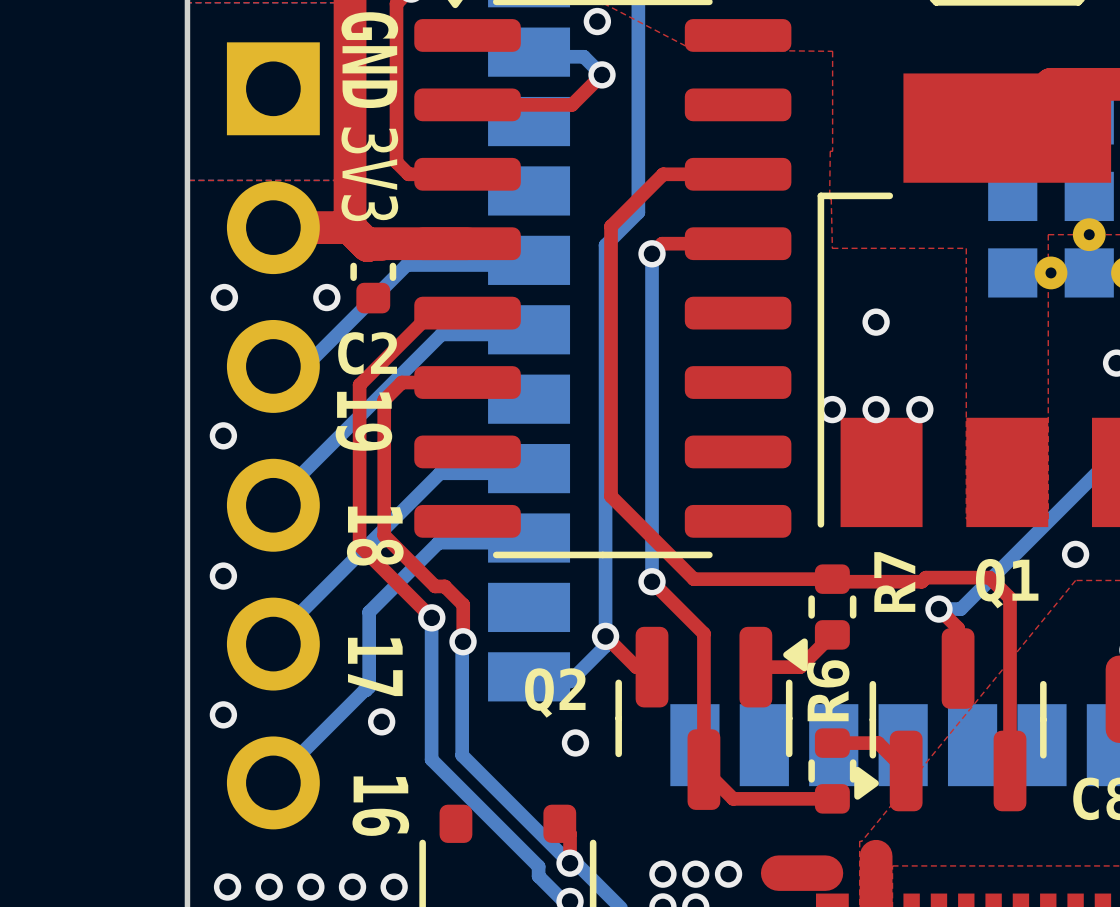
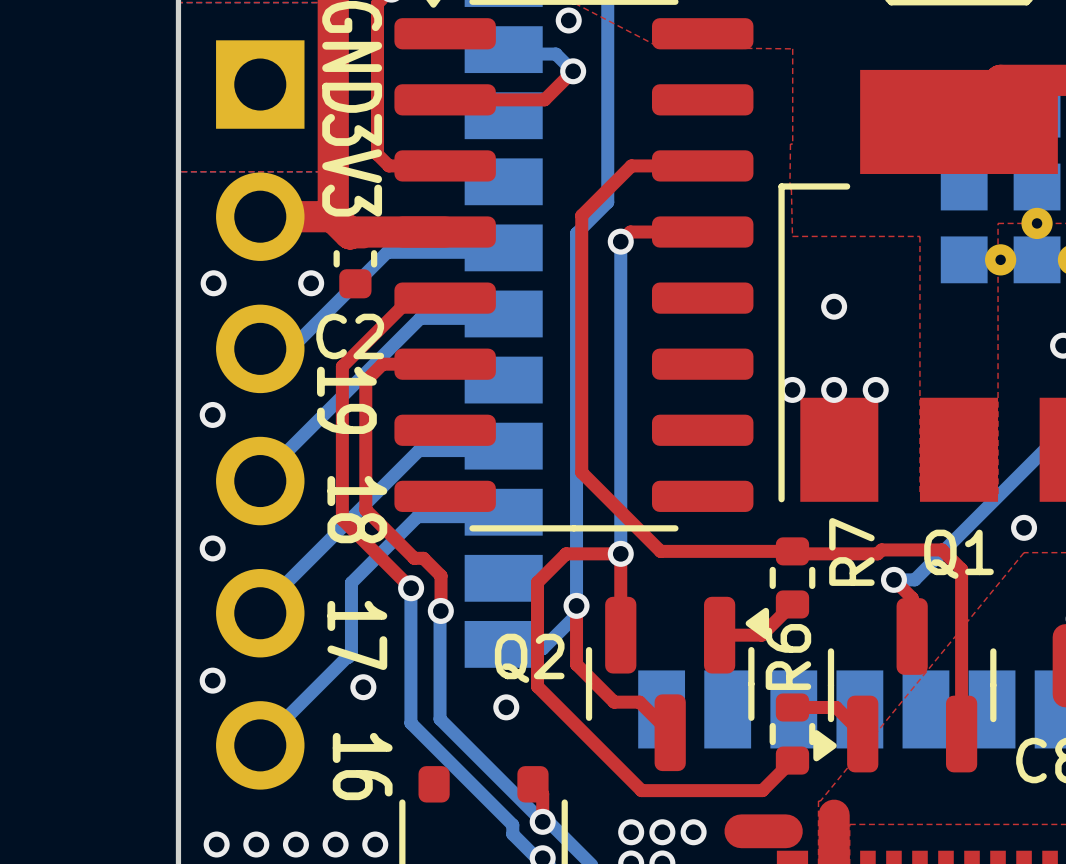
top track: (652, 581) (703, 633) (703, 769) (733, 798) (832, 798) -> (620, 635) (620, 553) (566, 553) (537, 582) (537, 686) (641, 790) (762, 790) (792, 760)
top track: (605, 636) (636, 667) (652, 667) -> (576, 605) (576, 664) (614, 702) (639, 702) (670, 732)
via position: (575, 742) -> (506, 707)

